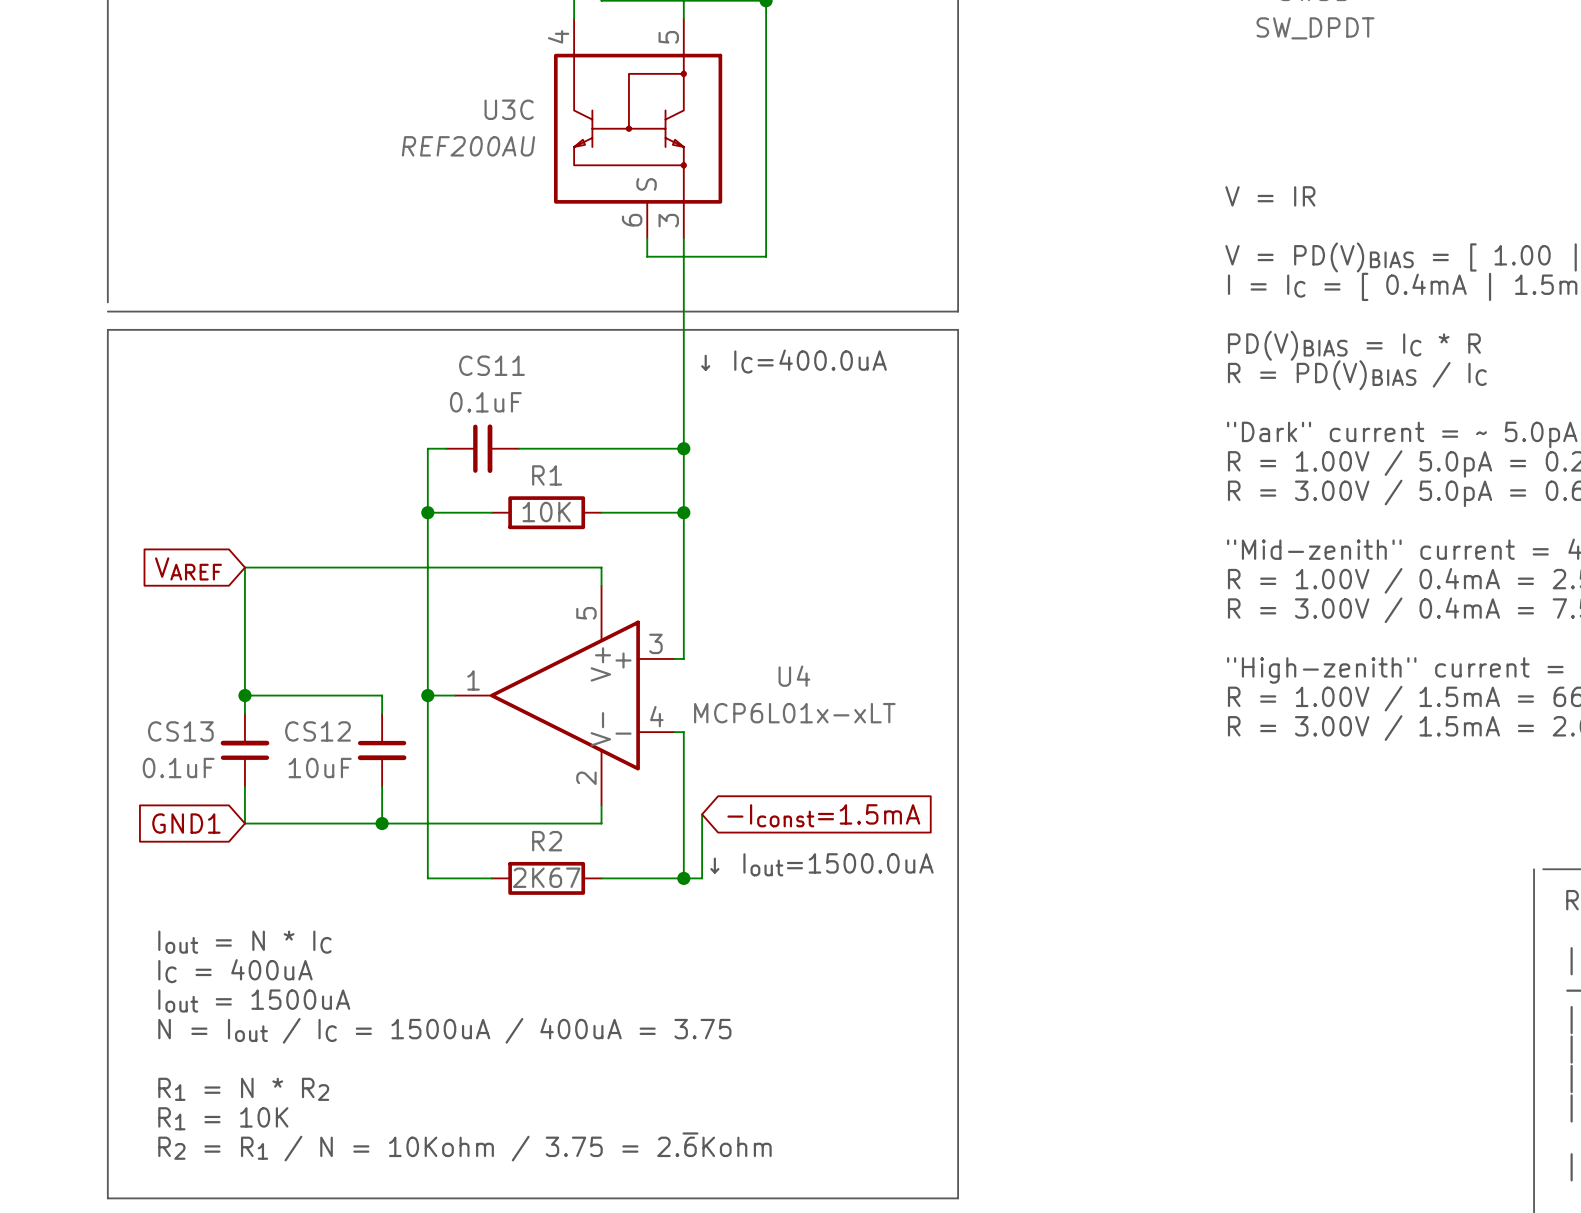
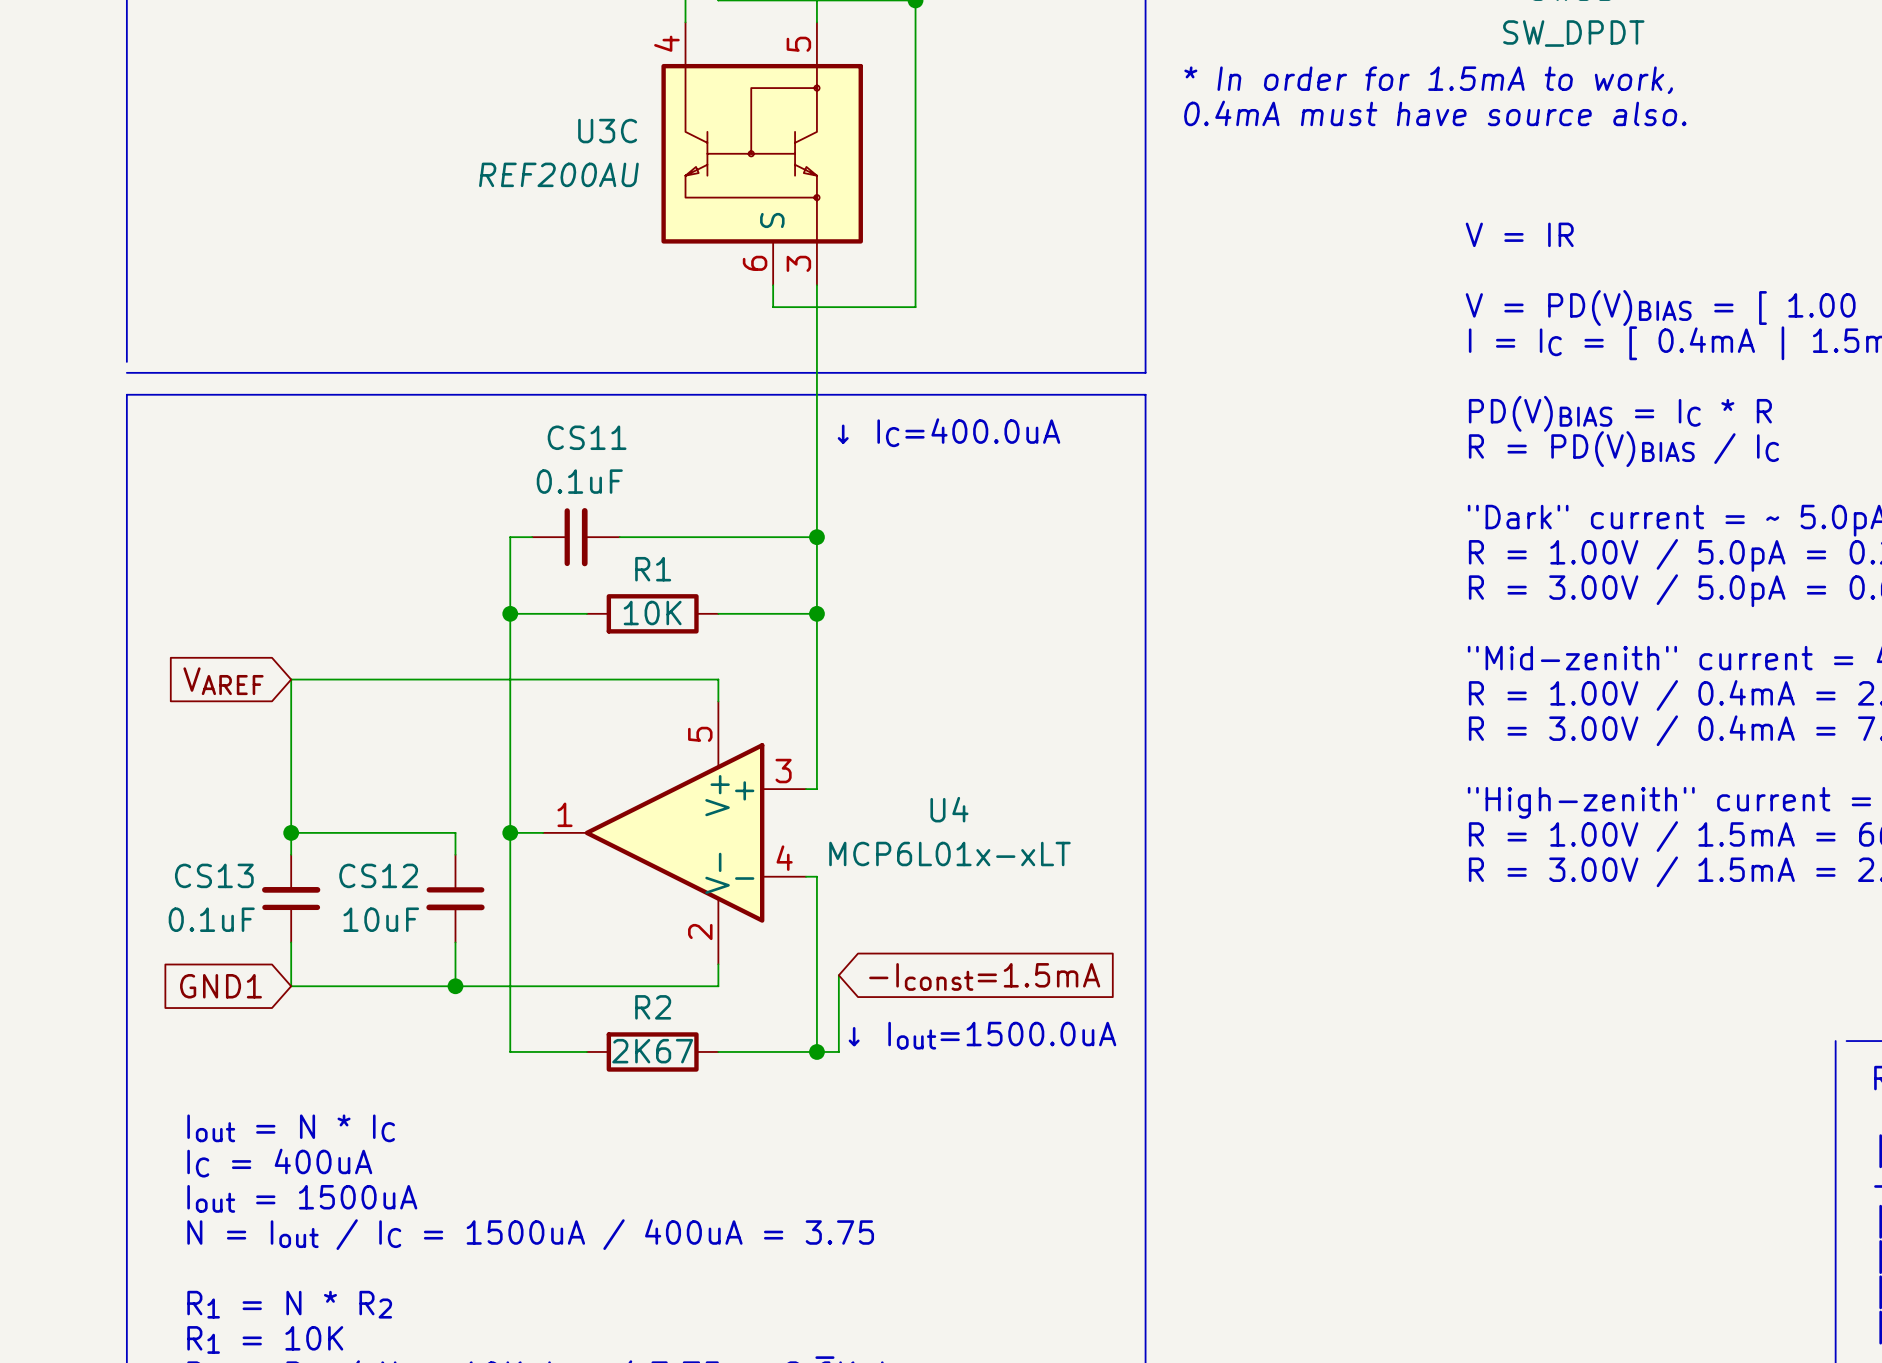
text: none -> * In order for 1.5mA to work, (1428, 80)
text: none -> 0.4mA must have source also. (1435, 113)

